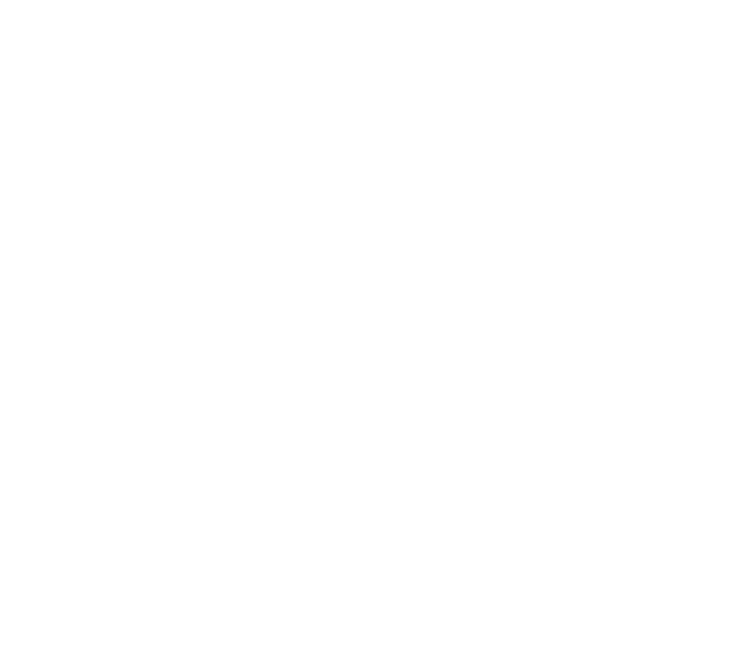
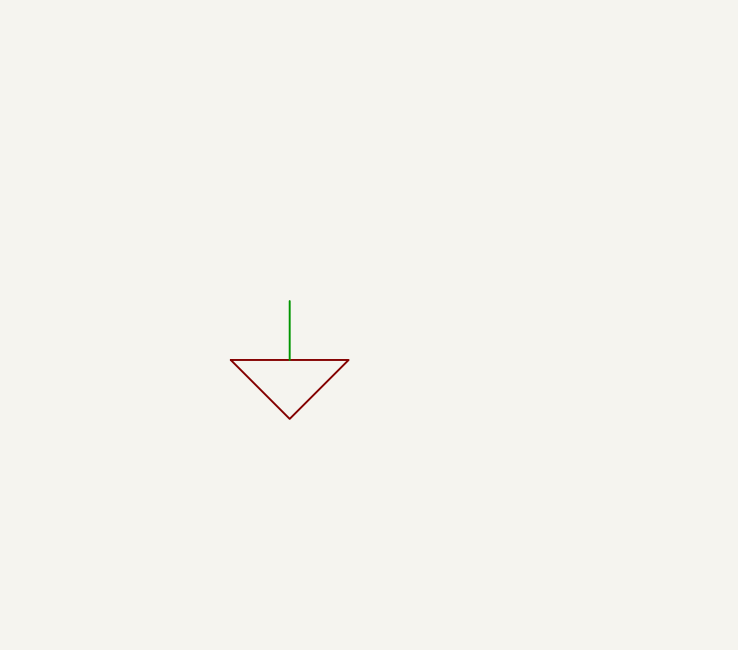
wire: none -> (289, 301) (289, 359)
power symbol: none -> (289, 389)

